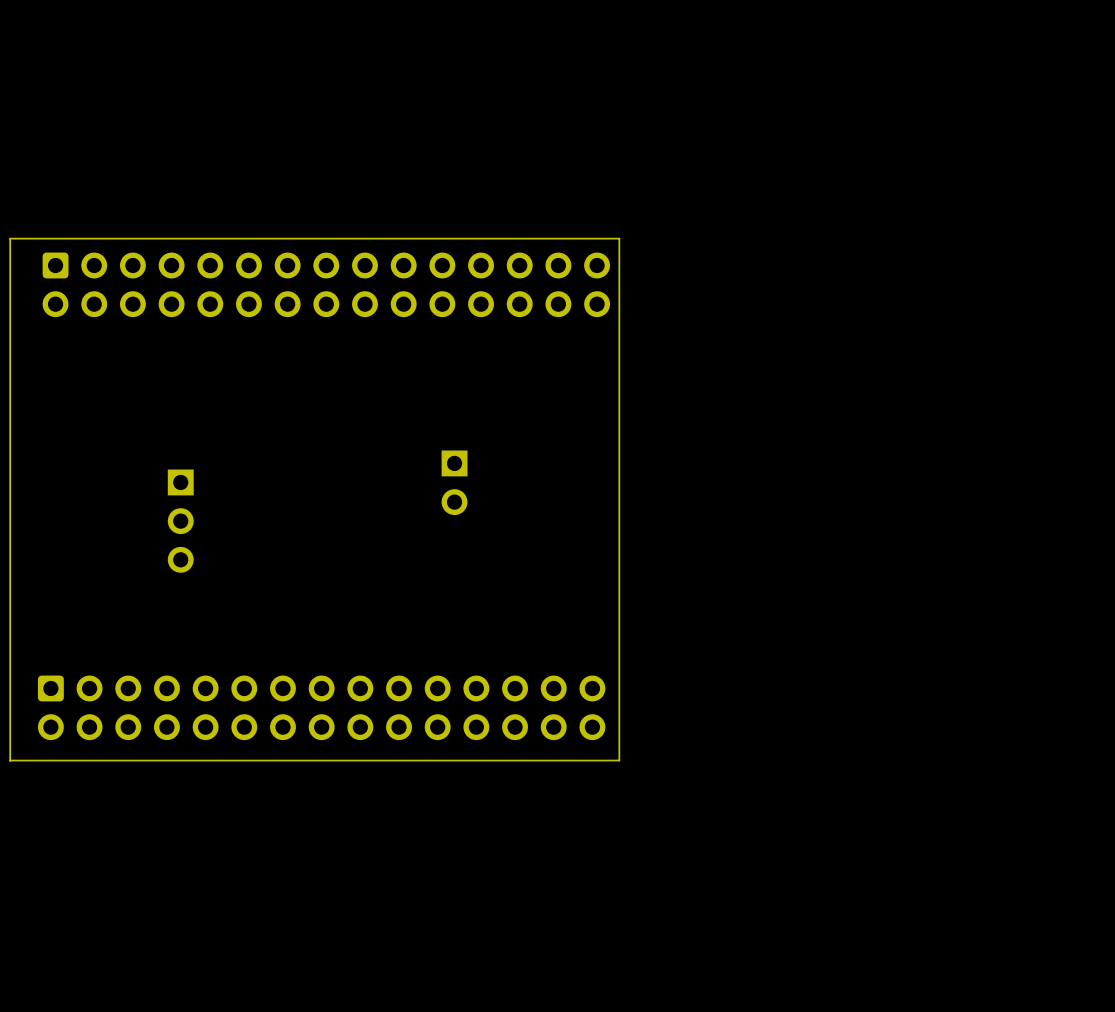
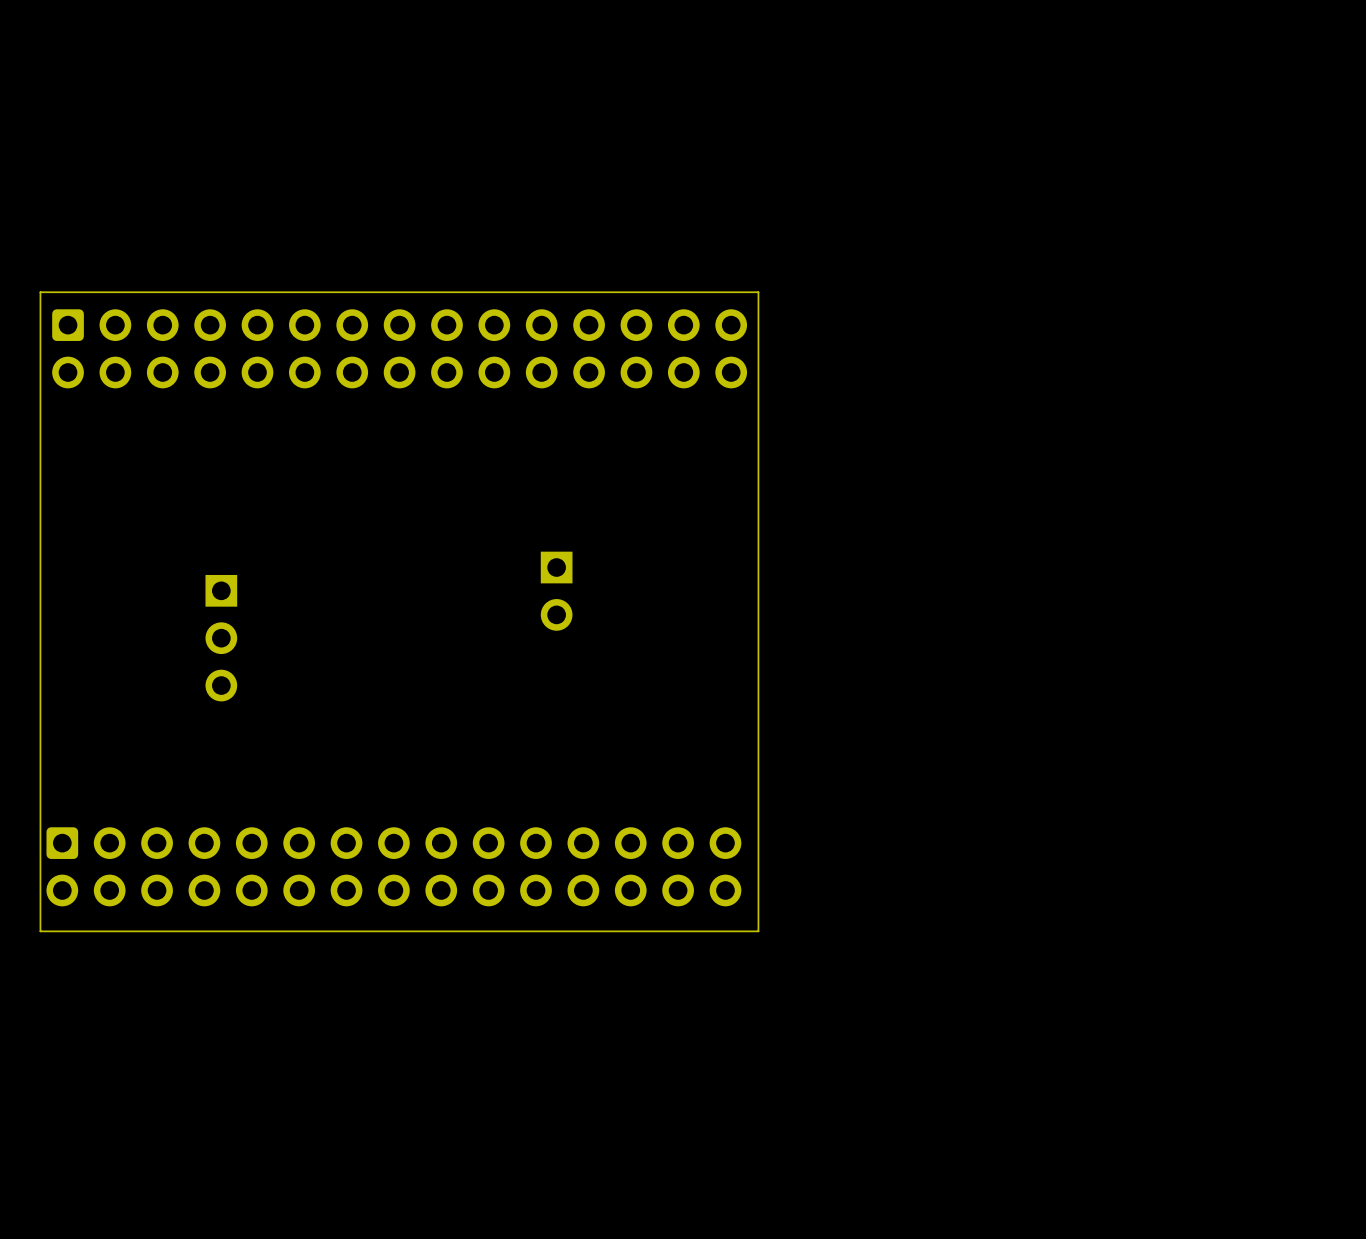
board edge: (33, 238) (10, 238) -> (40, 292) (40, 931)
board edge: (10, 239) (10, 760) -> none
board edge: (33, 760) (10, 760) -> none

